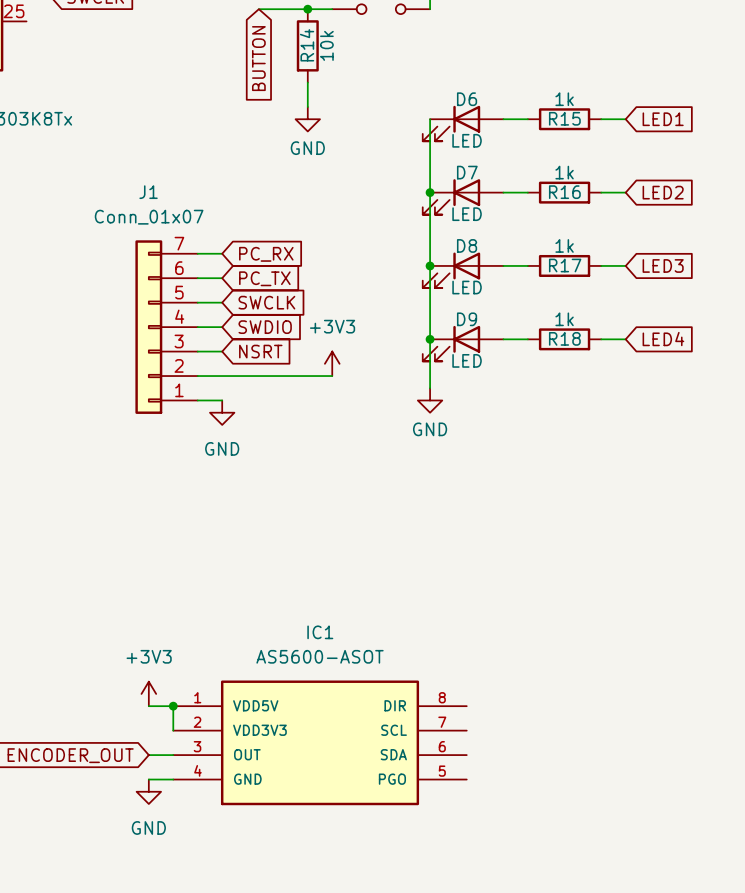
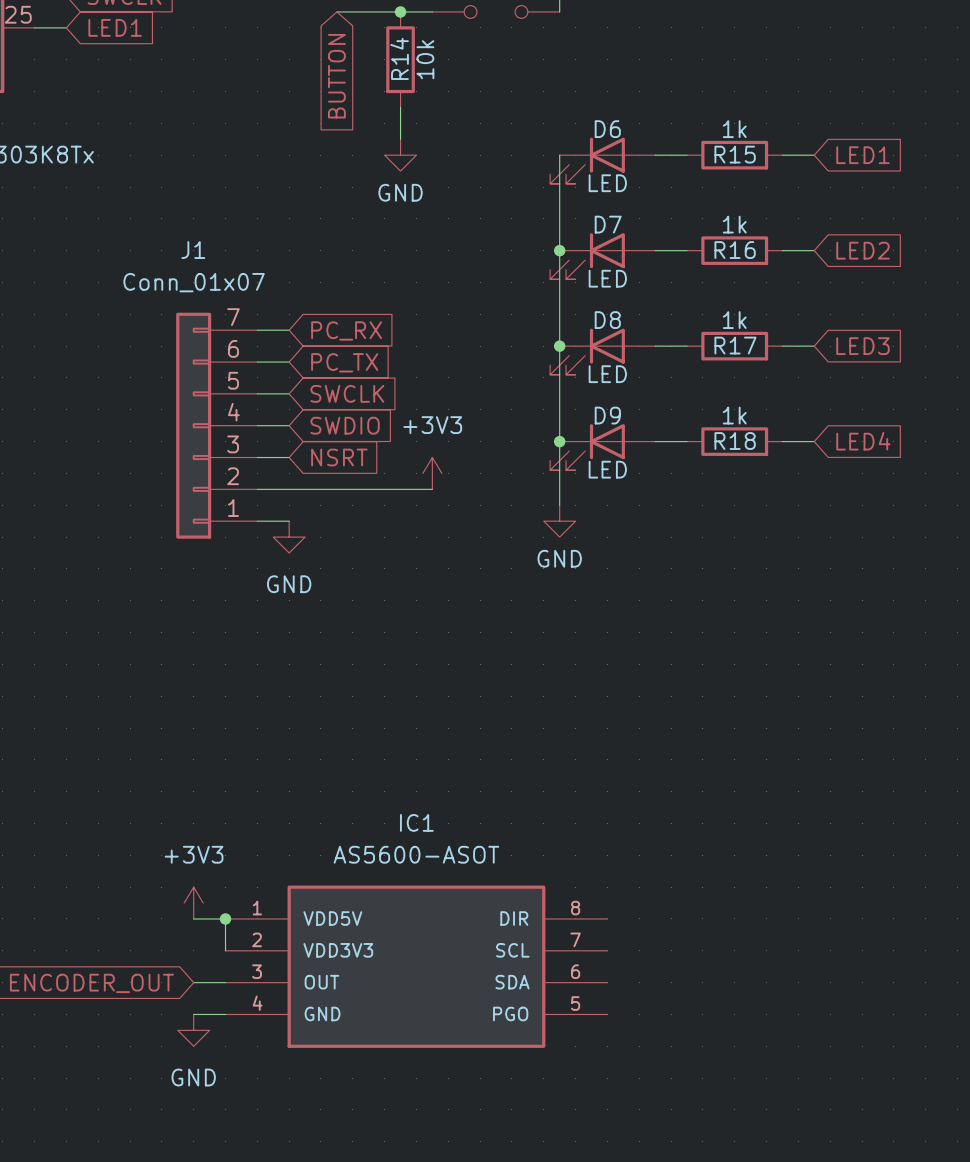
wire: none -> (34, 27) (66, 27)
global label: none -> LED1 (115, 27)

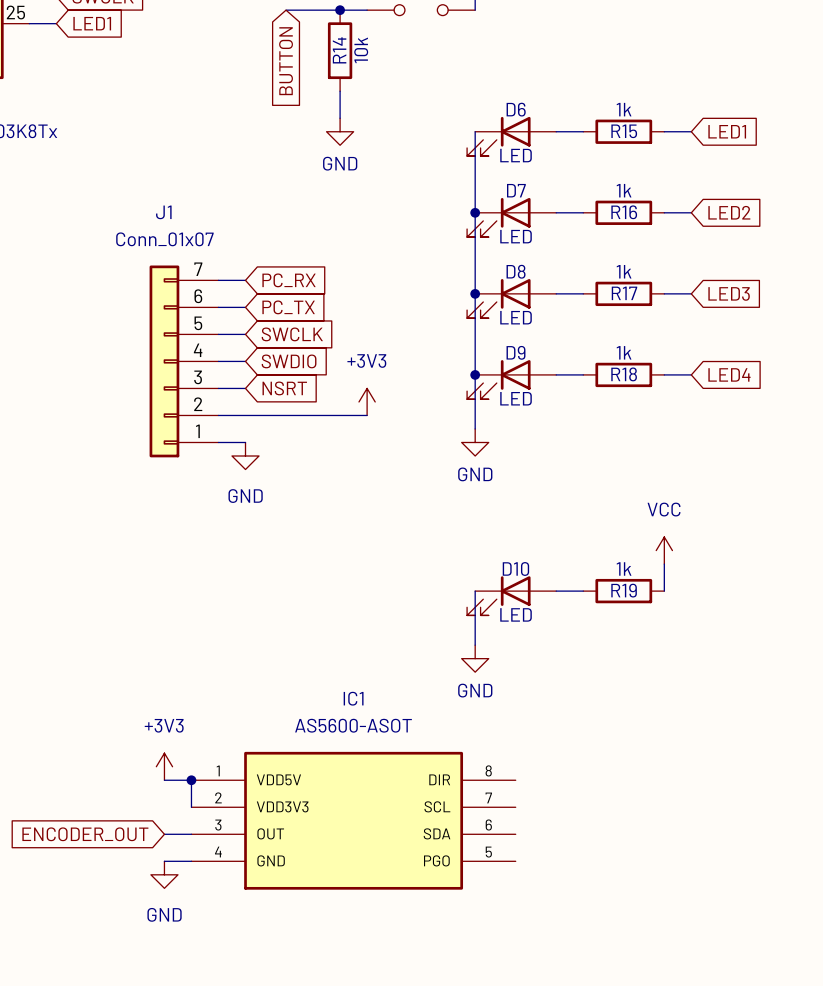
power symbol: none -> VCC (664, 550)
wire: none -> (664, 564) (664, 591)
wire: none -> (475, 591) (475, 645)
wire: none -> (556, 591) (583, 591)
R19: none -> 1k (623, 591)
D10: none -> LED (511, 595)
power symbol: none -> GND (475, 658)

